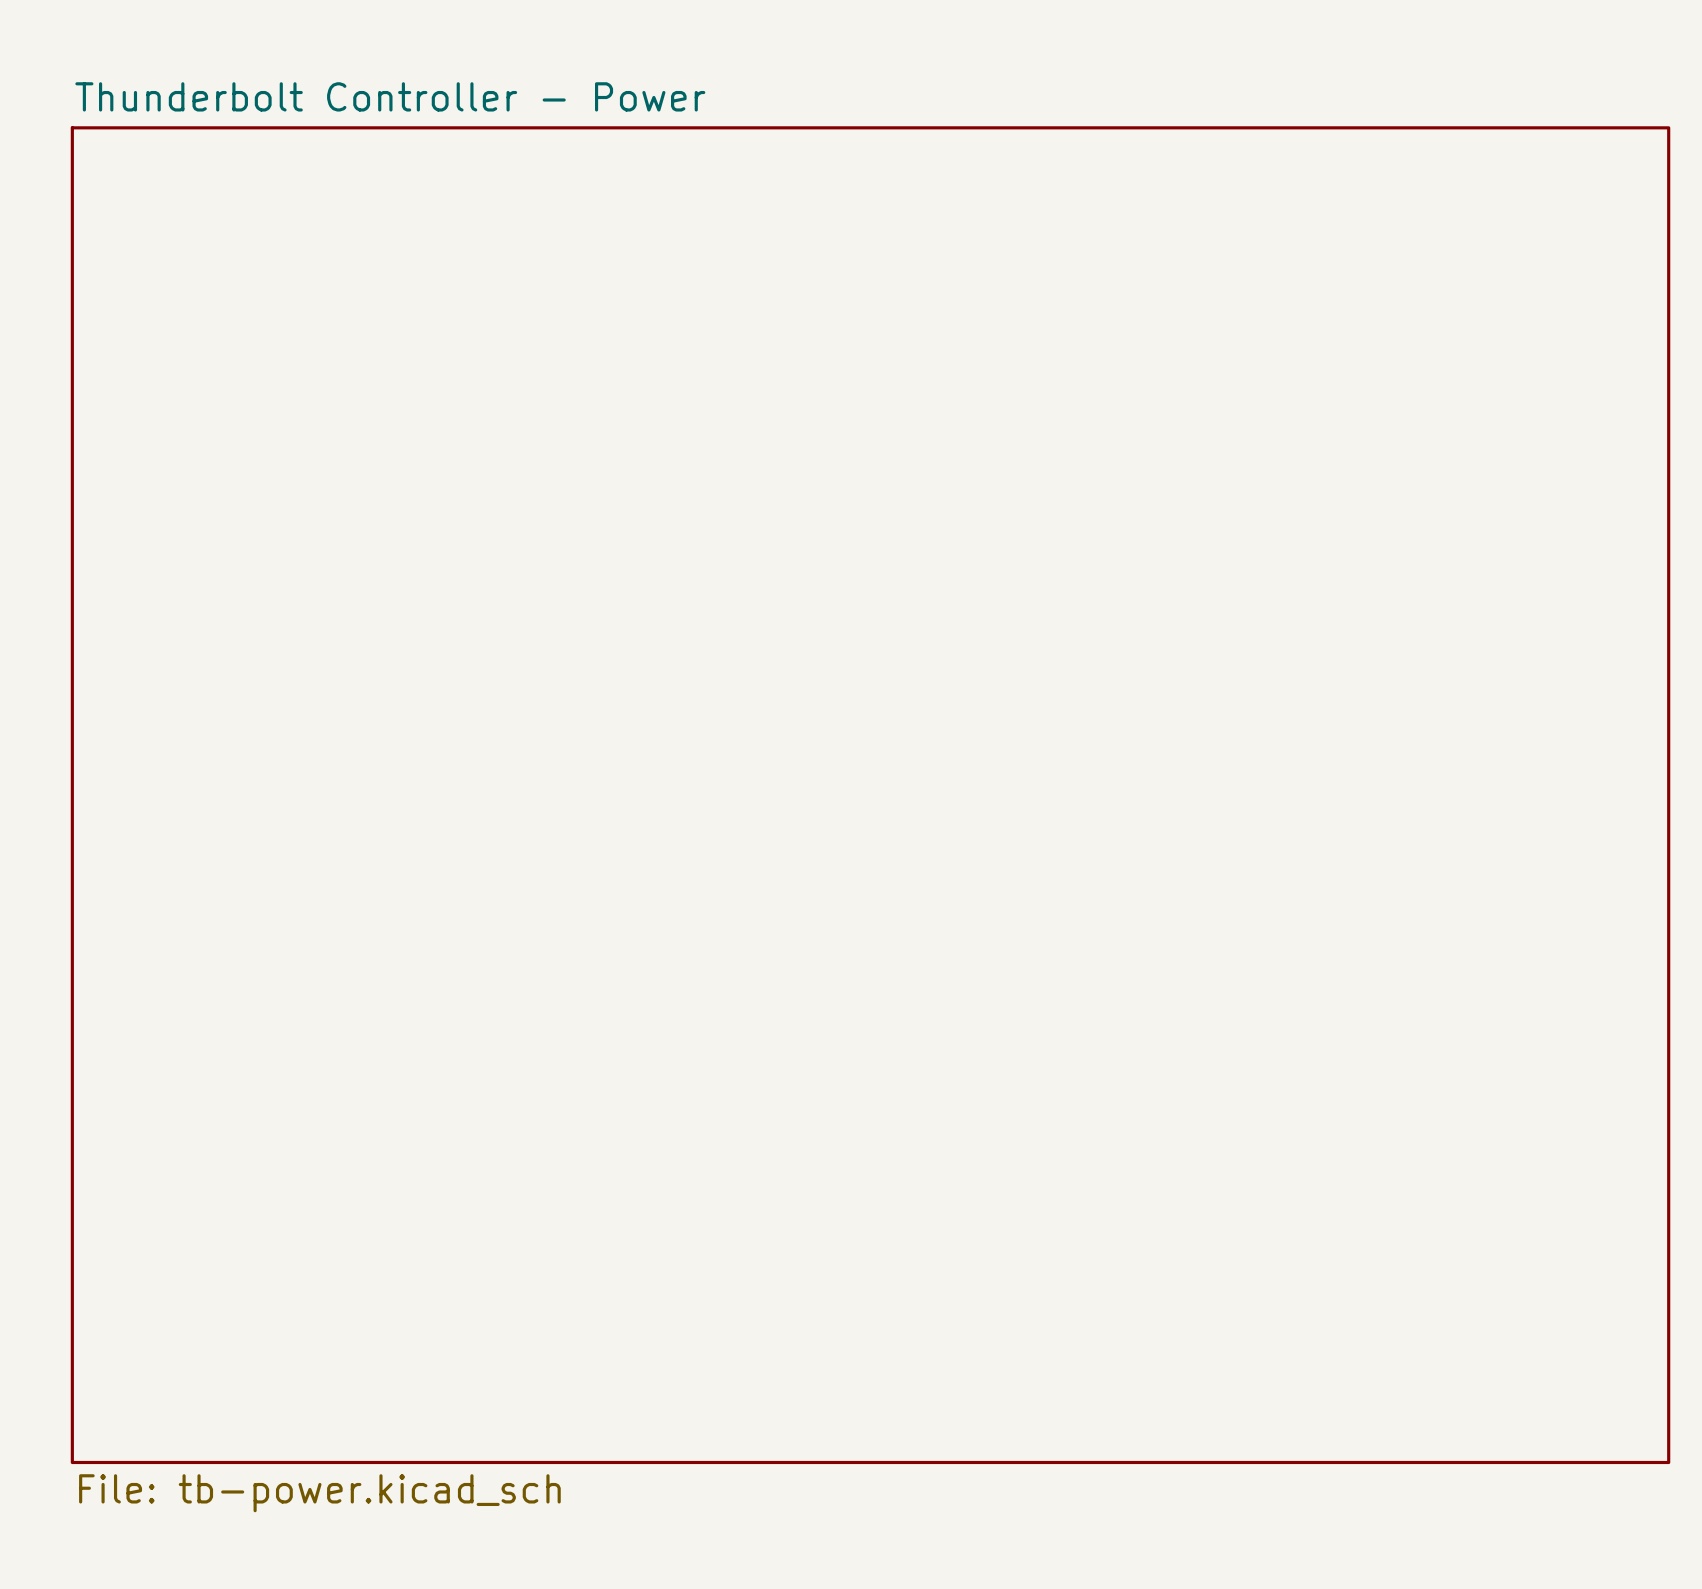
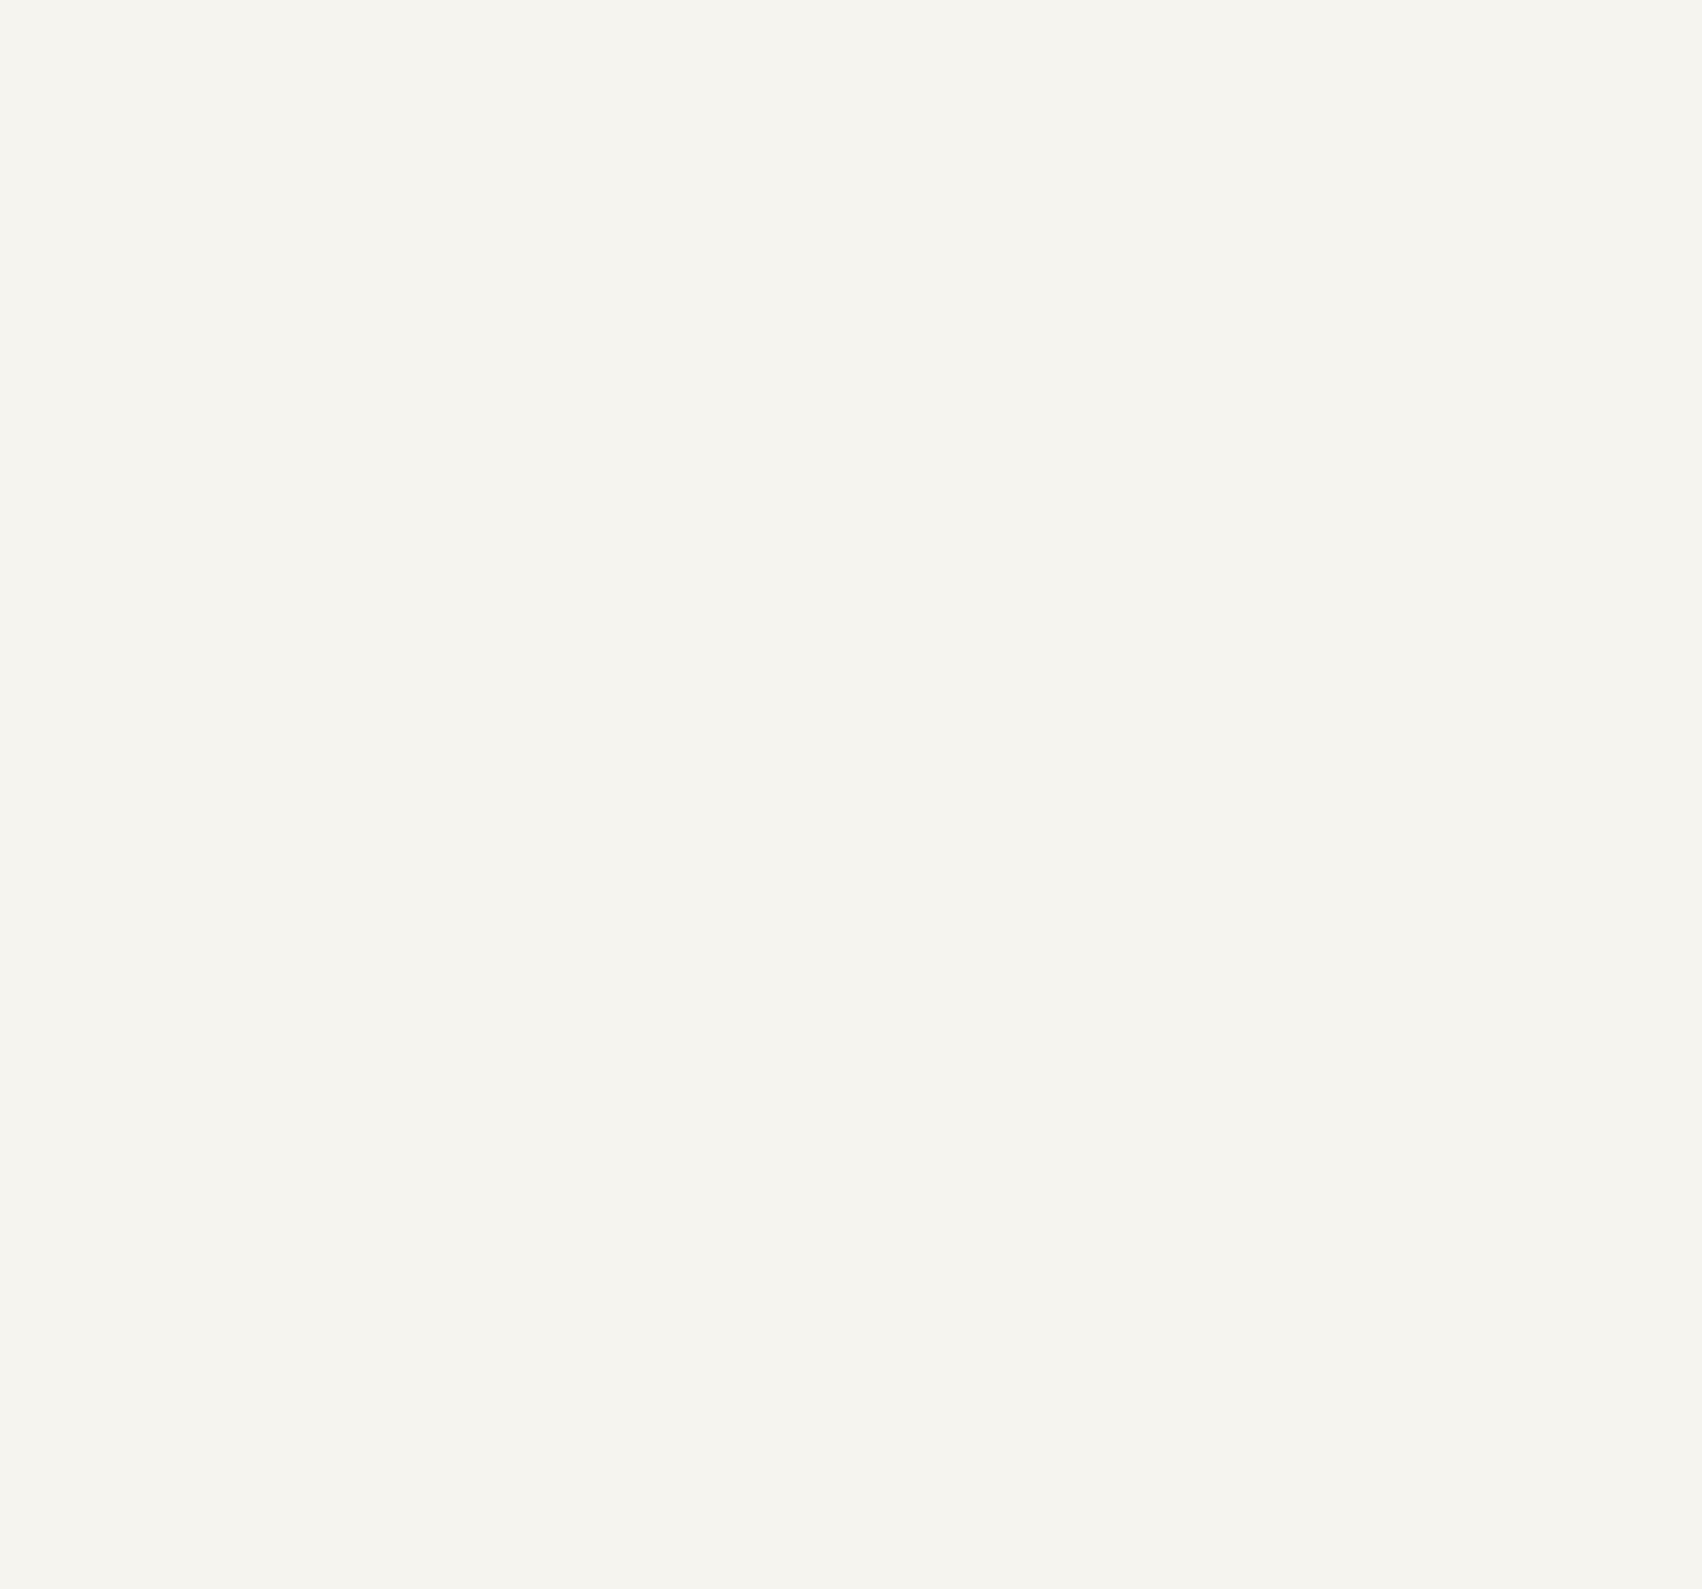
sheet Thunderbolt Controller - Power: File: tb-power.kicad_sch (870, 795) -> none

